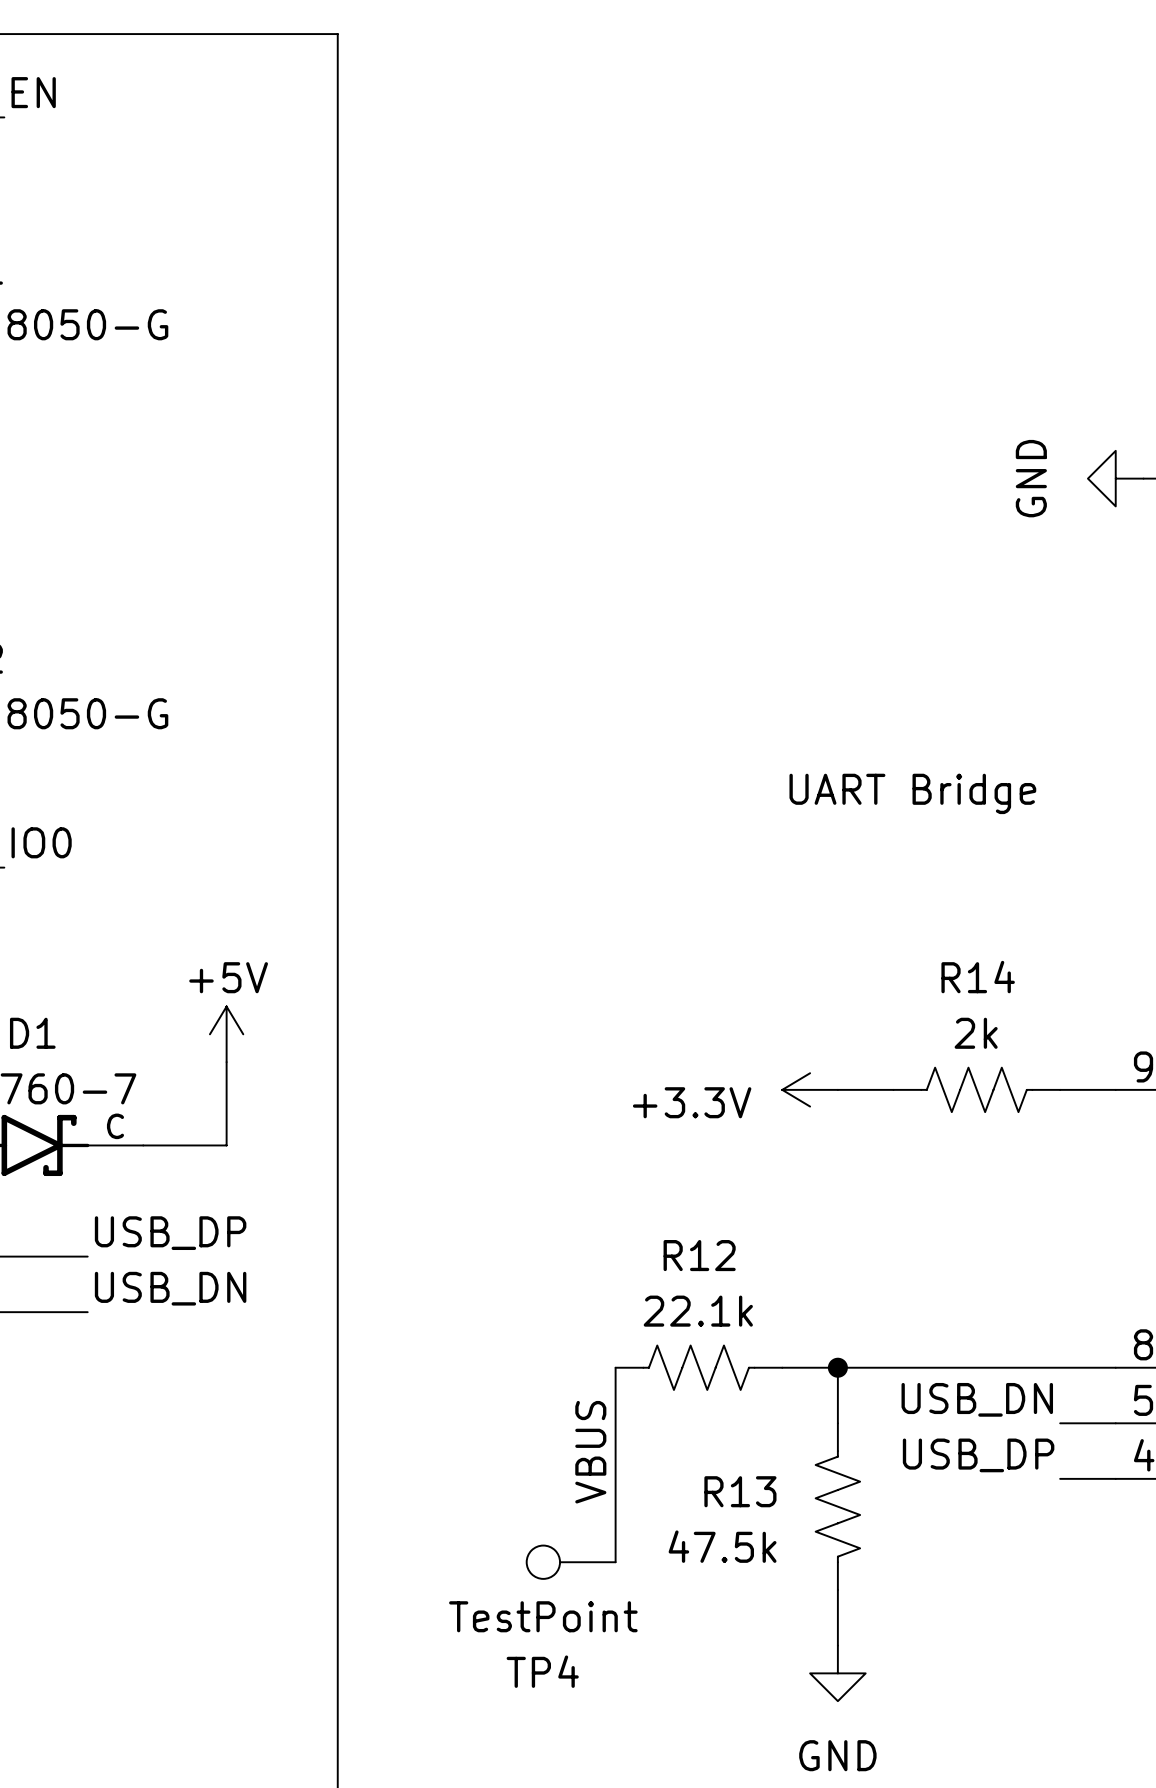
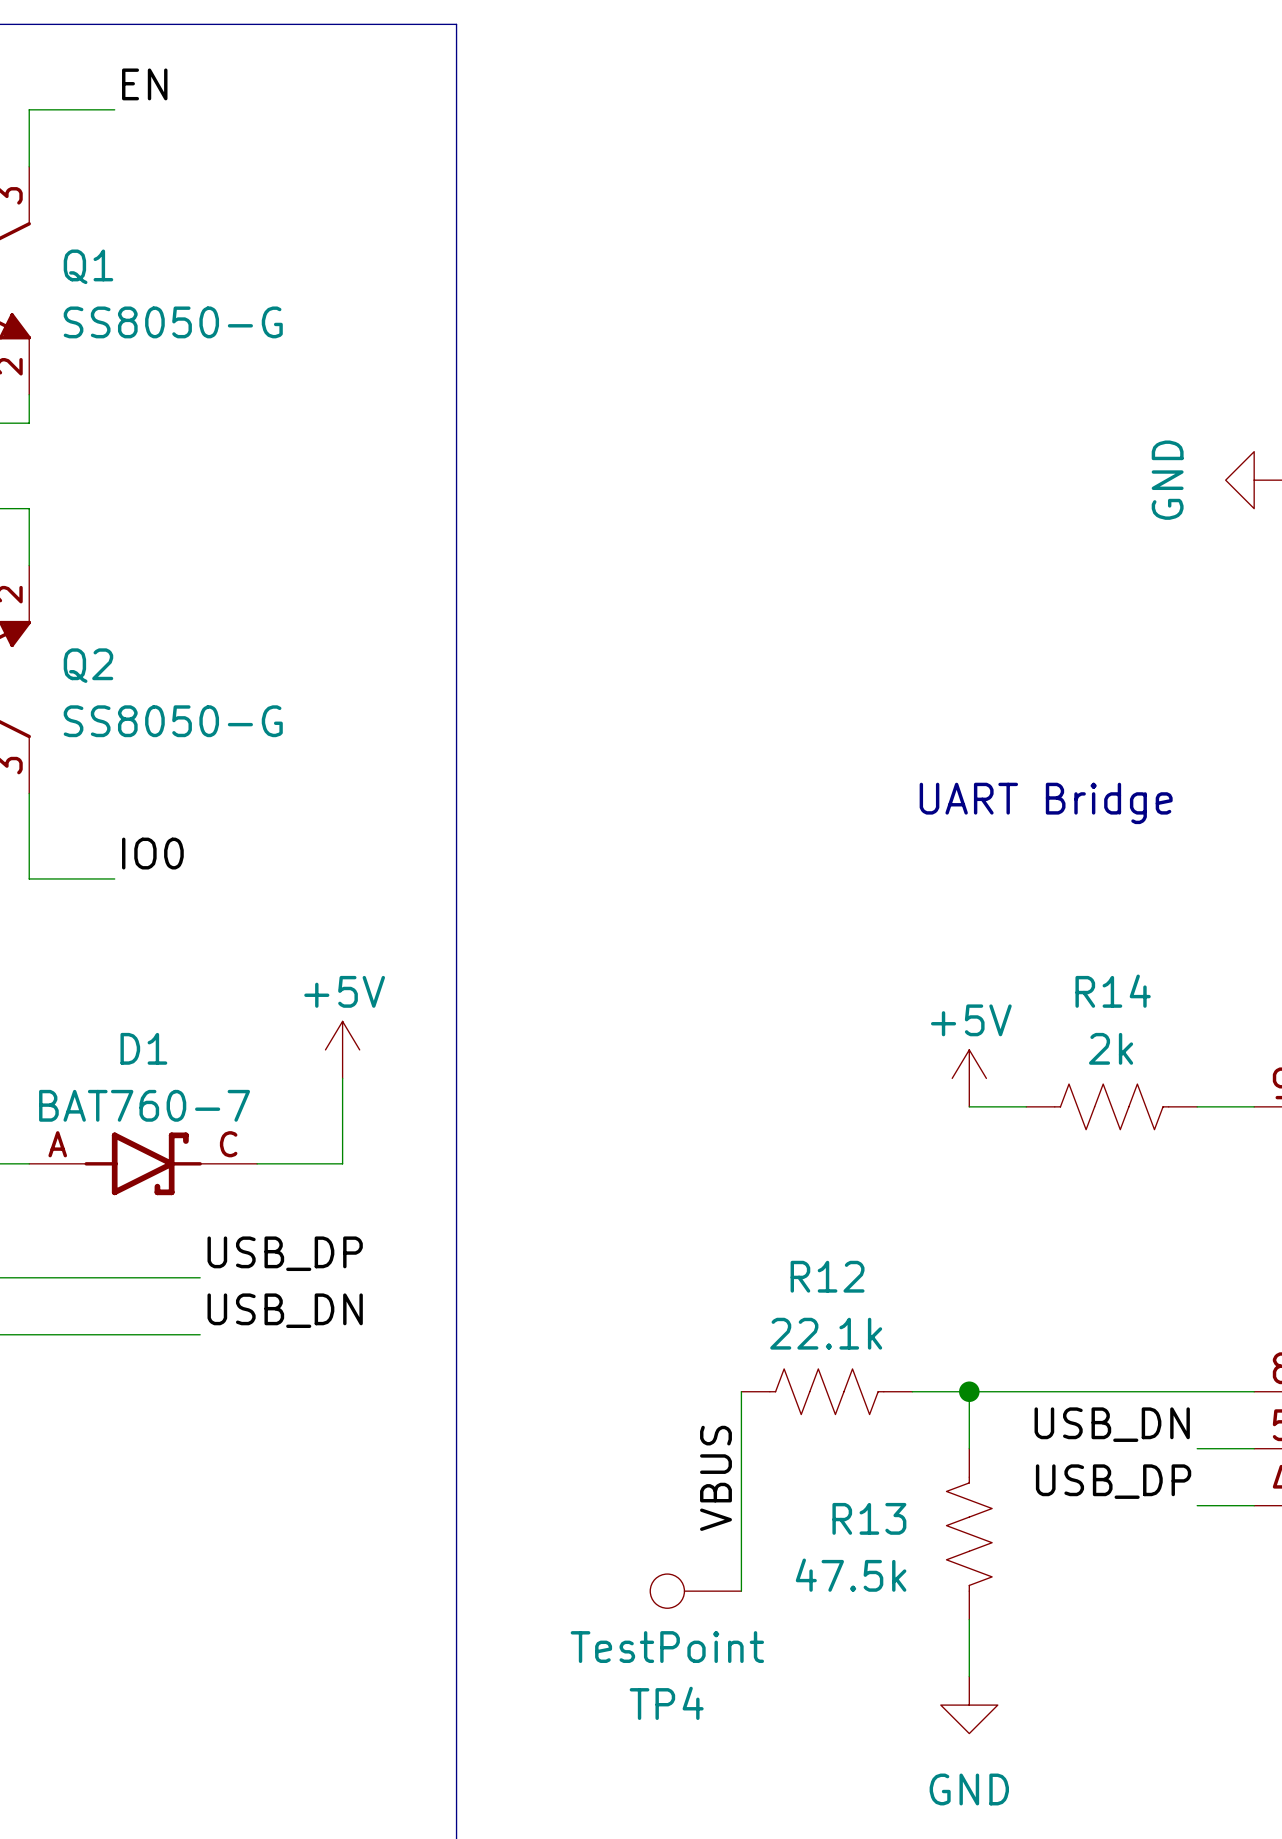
power symbol: none -> +5V (969, 1078)
power symbol: +3.3V (810, 1089) -> none

